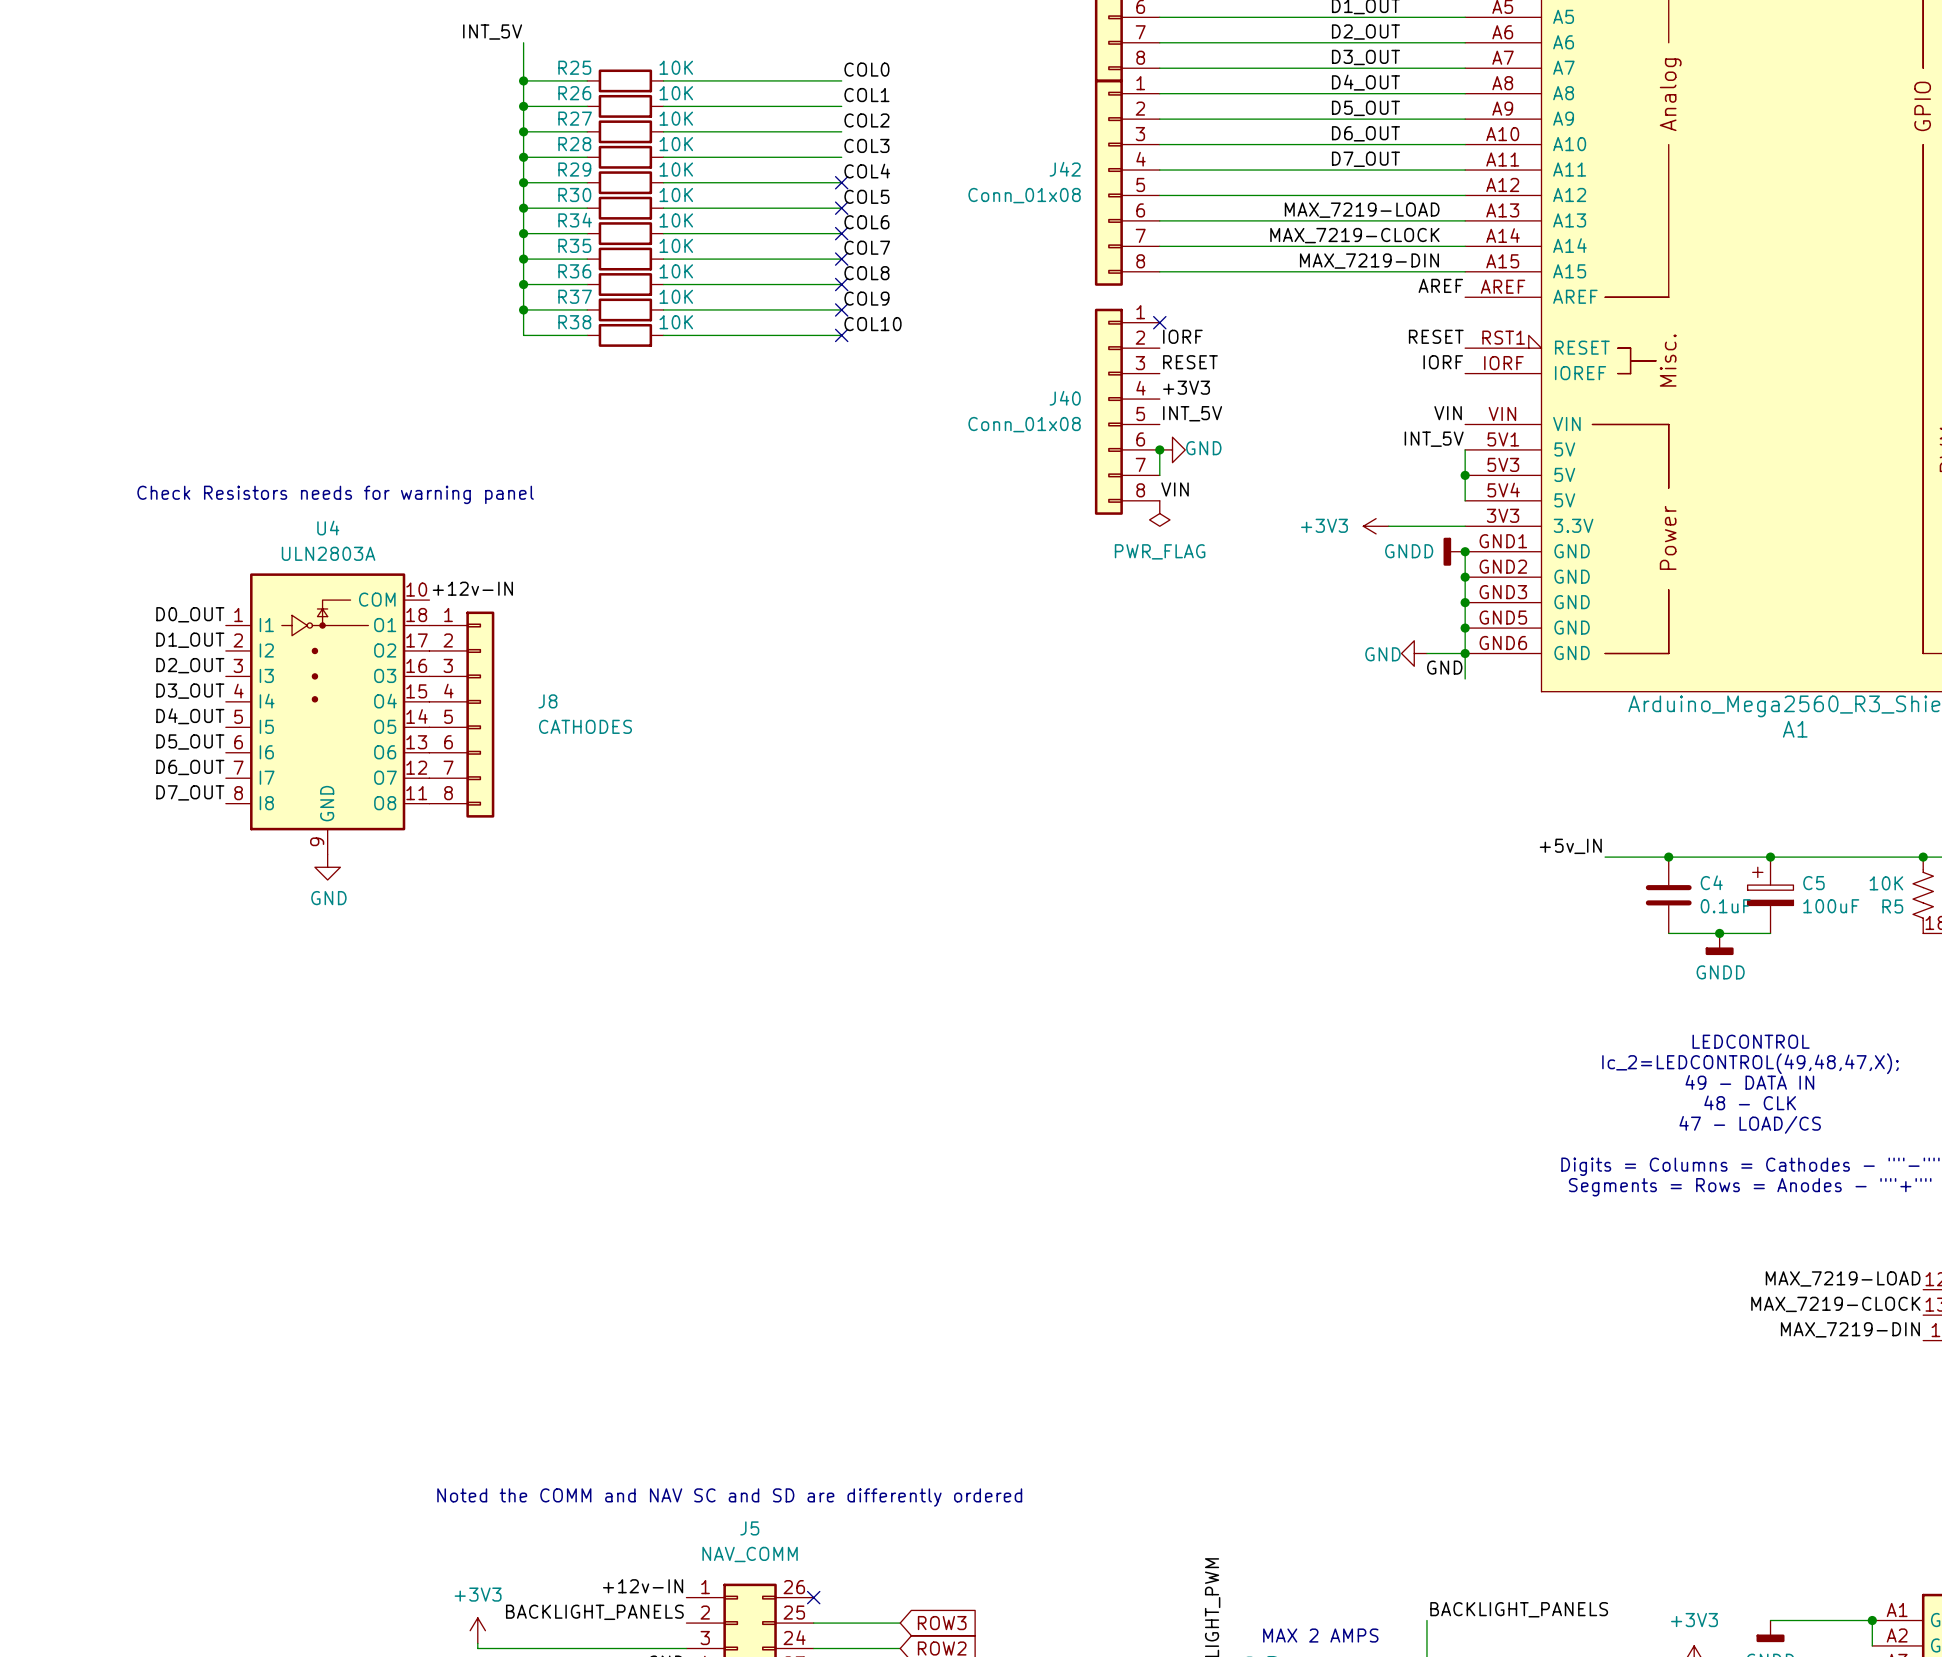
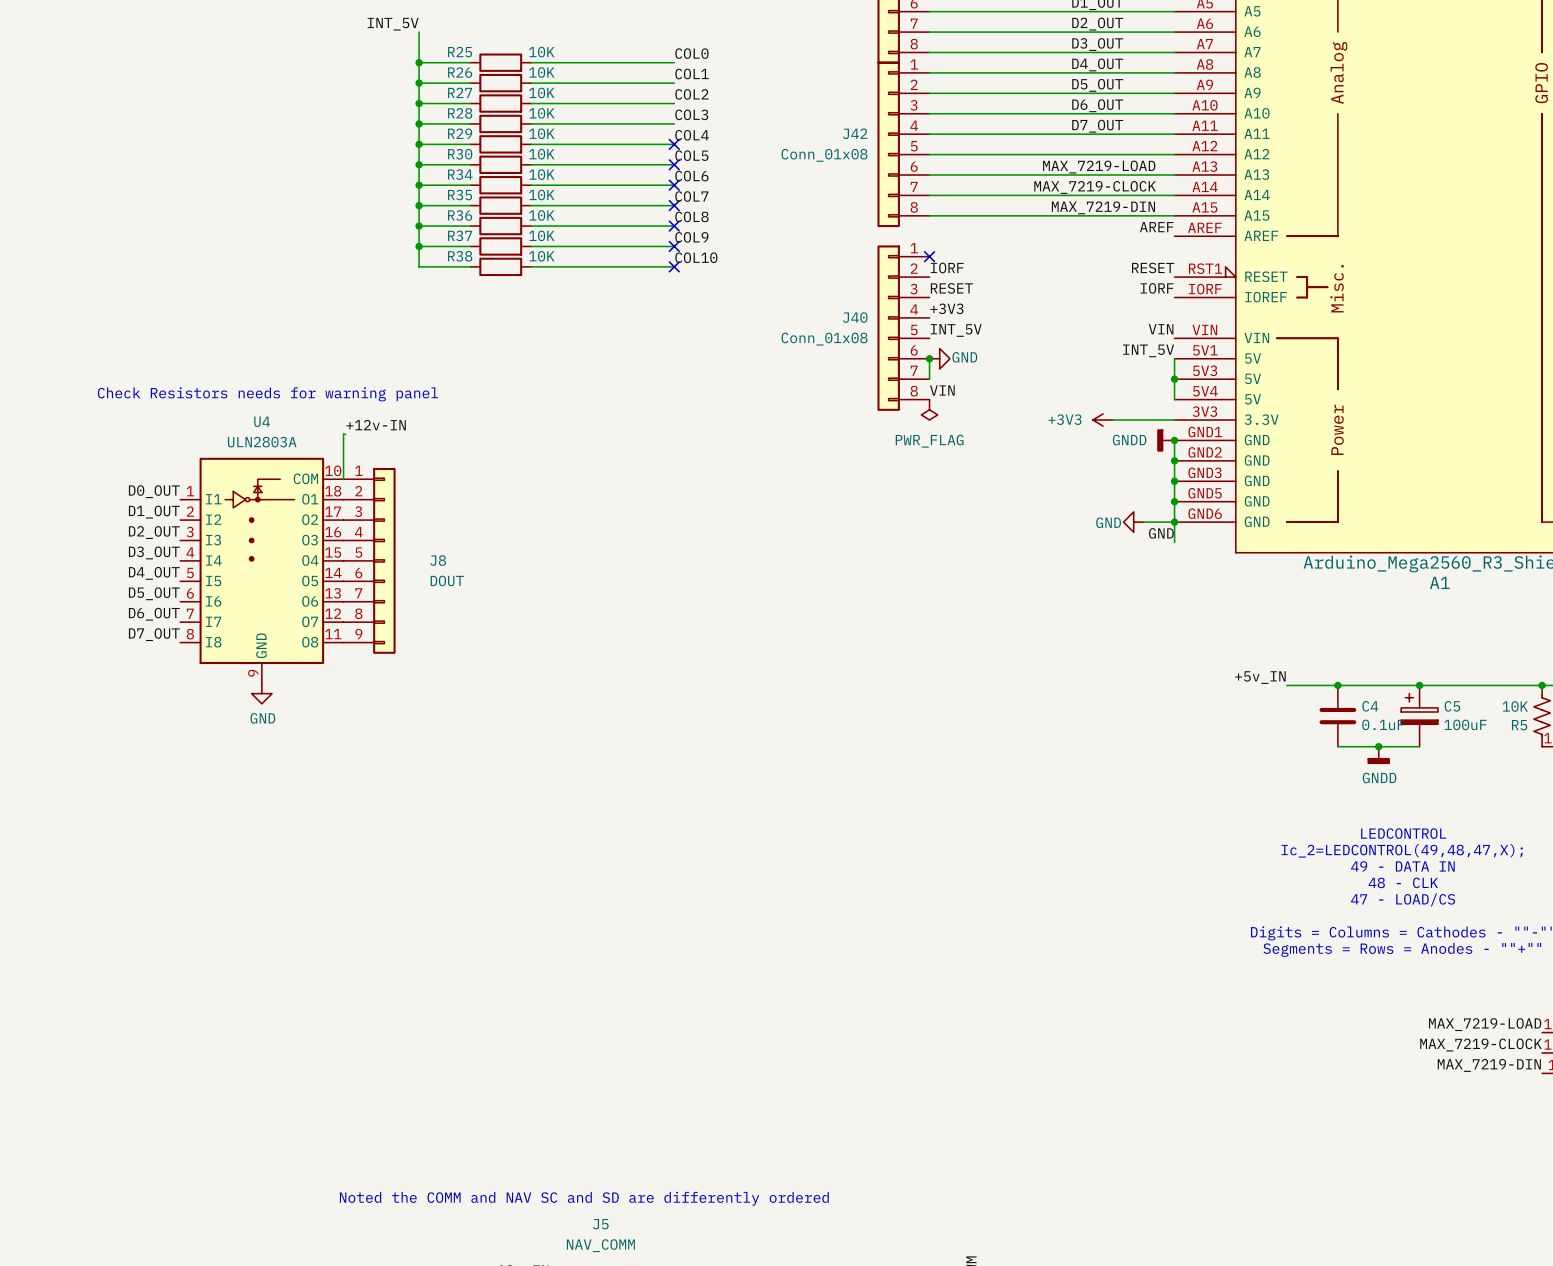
wire: none -> (345, 434) (343, 434) (343, 479)
label position: +12v-IN (472, 588) -> +12v-IN (376, 425)
J8 symbol: [429, 611, 495, 818] -> [343, 468, 396, 654]
J8 value: CATHODES (585, 726) -> DOUT (447, 580)

